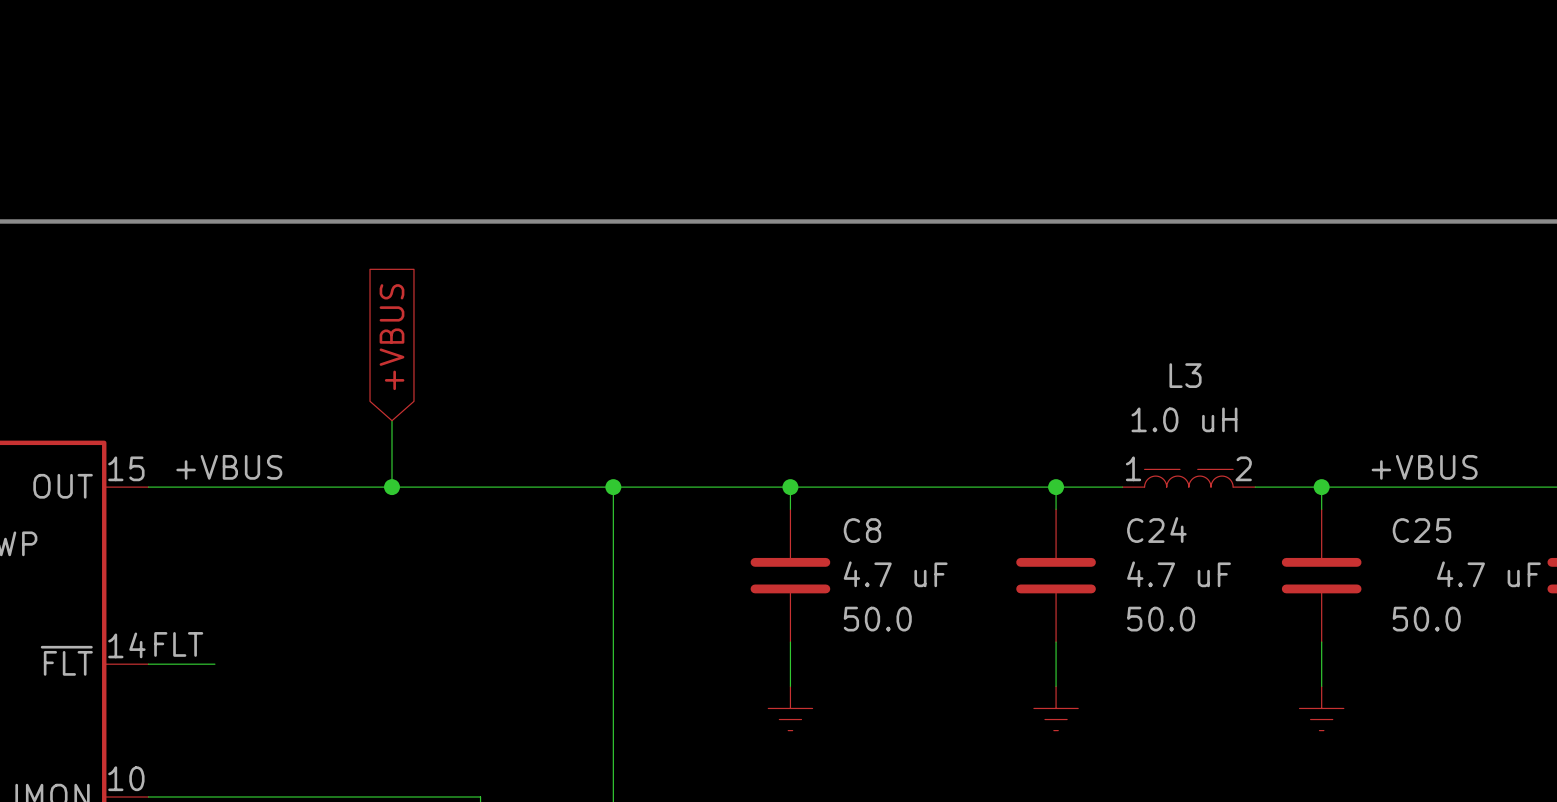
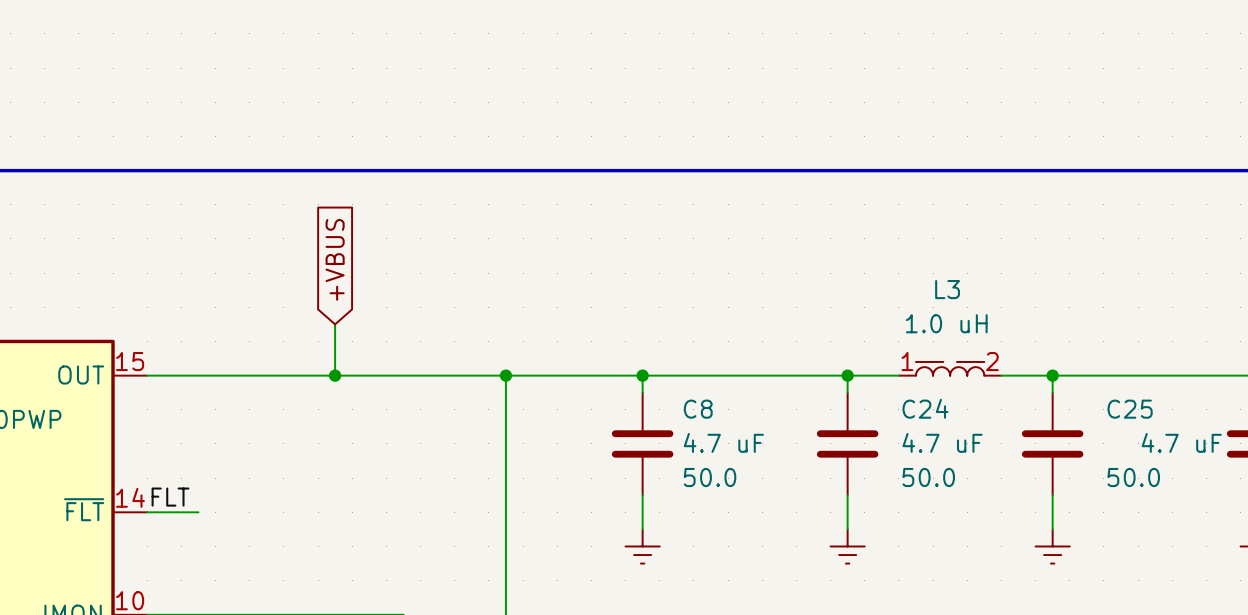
label: +VBUS (229, 467) -> none
label: +VBUS (1424, 467) -> none

